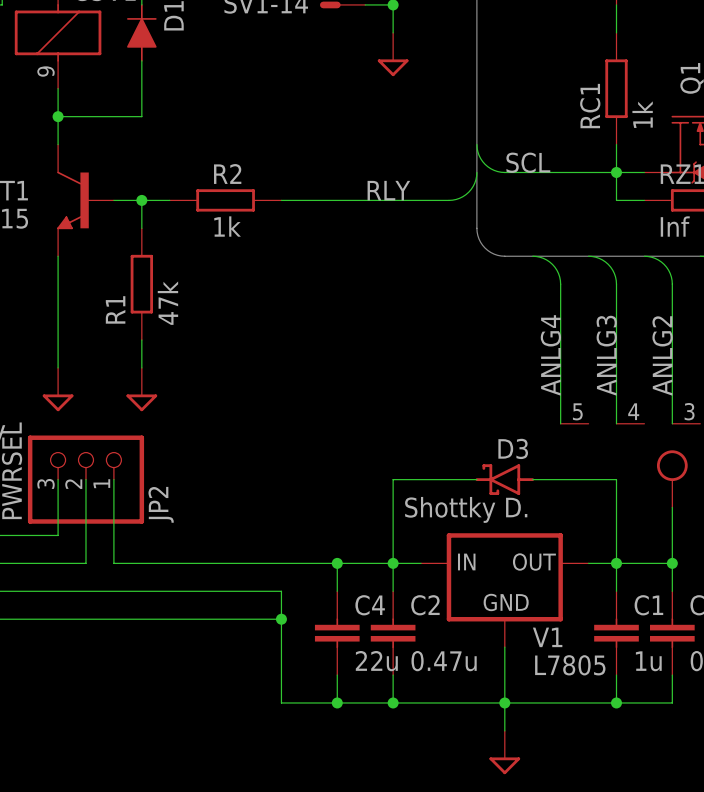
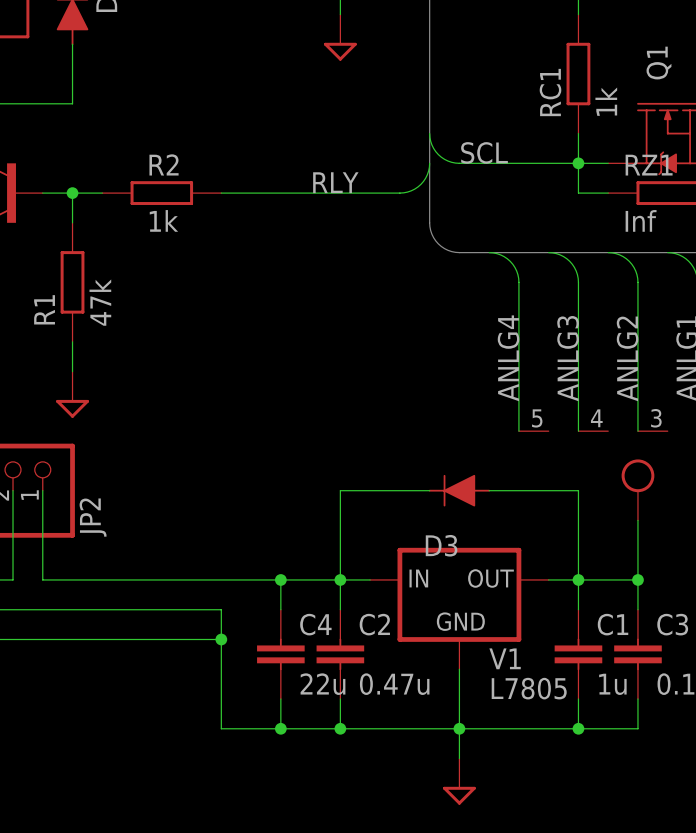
D3 name position: D3 (513, 448) -> D3 (441, 545)
D3 symbol: [475, 464, 535, 495] -> [428, 474, 491, 507]
D3 value: Shottky D. (466, 509) -> none

